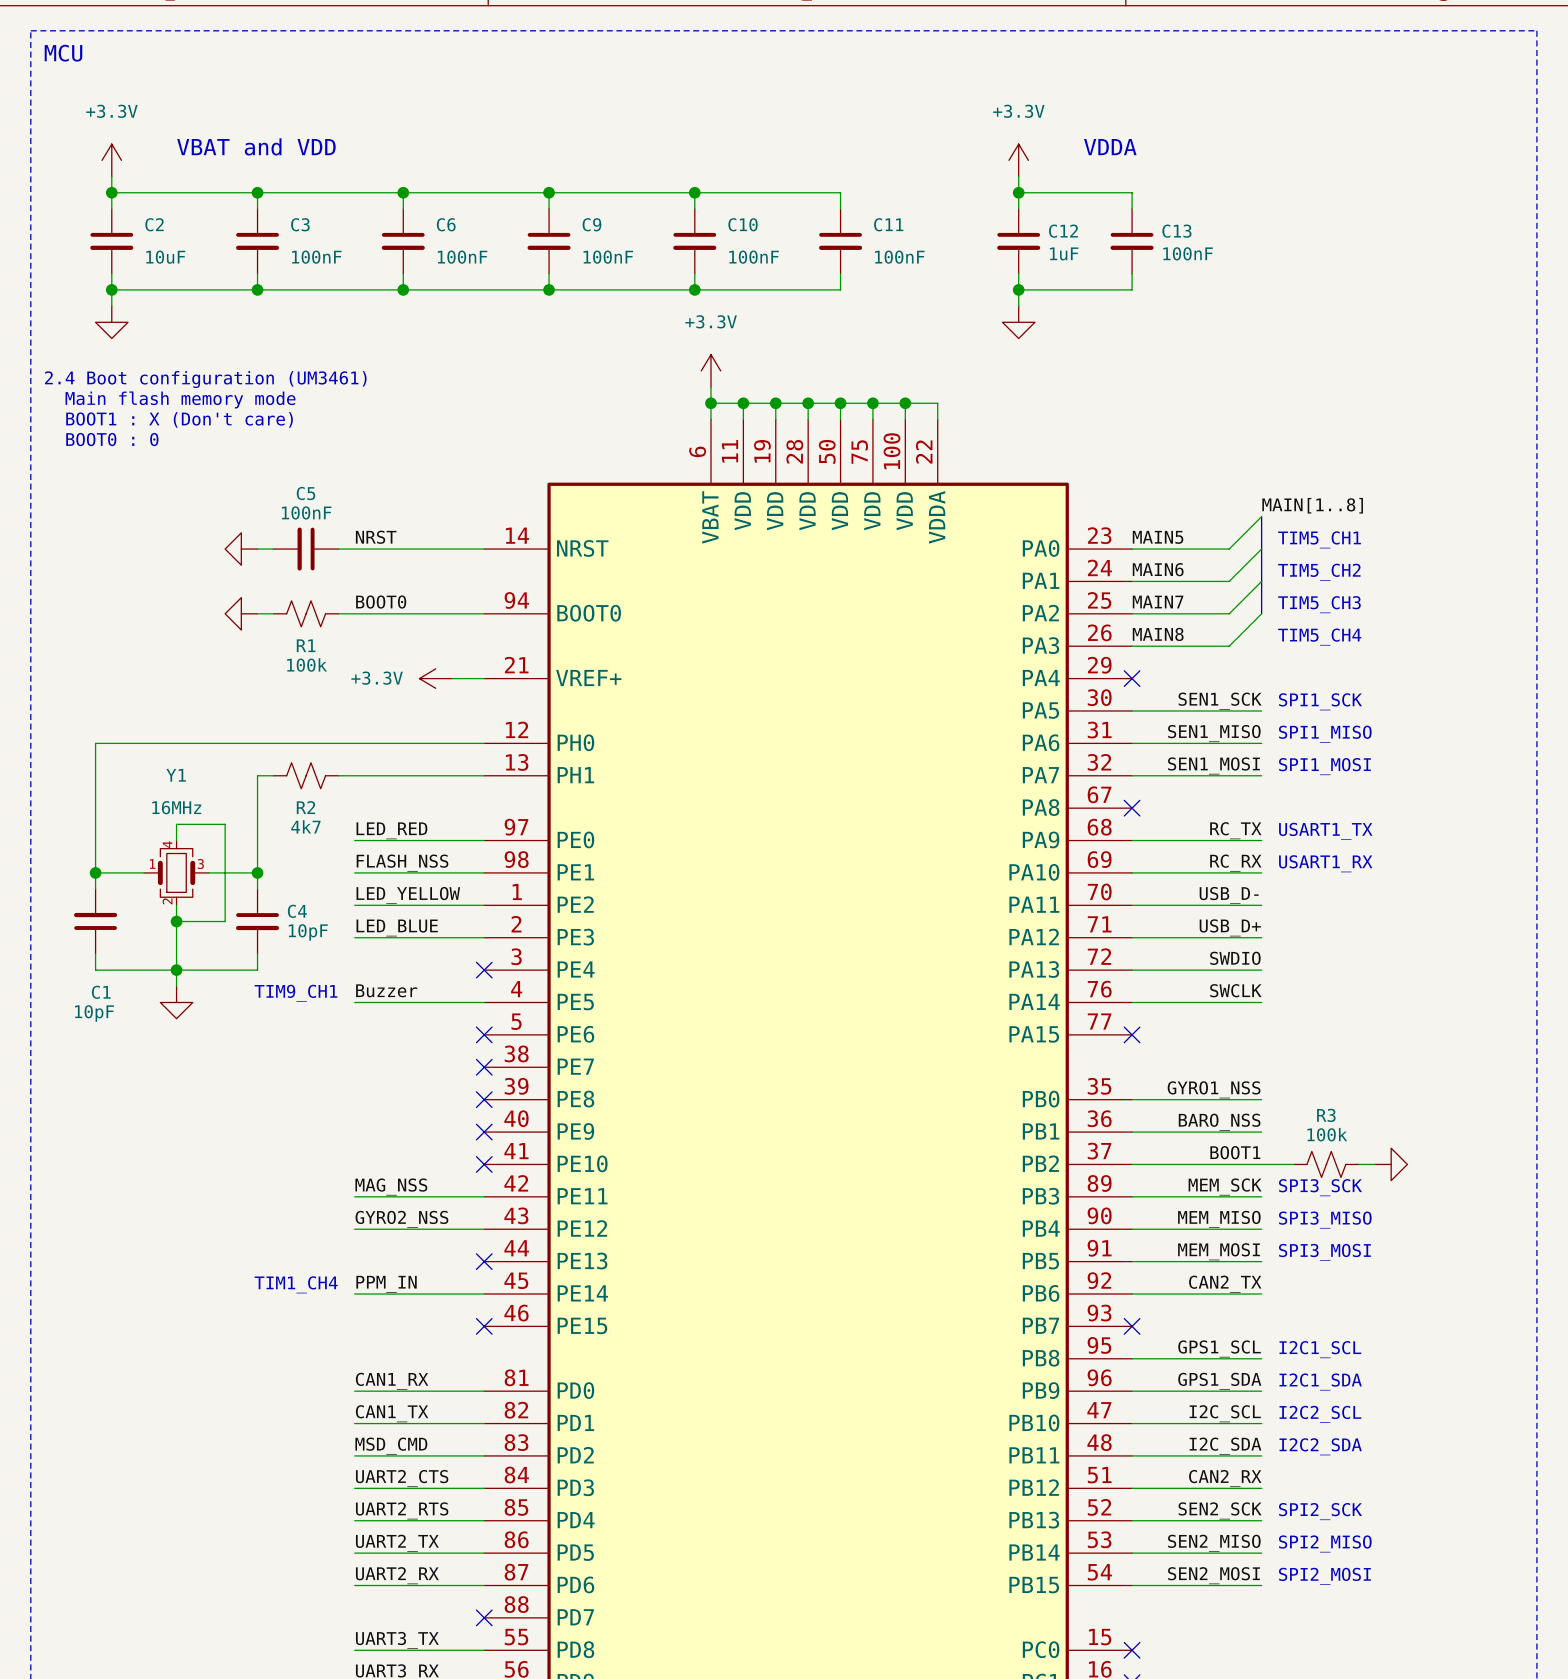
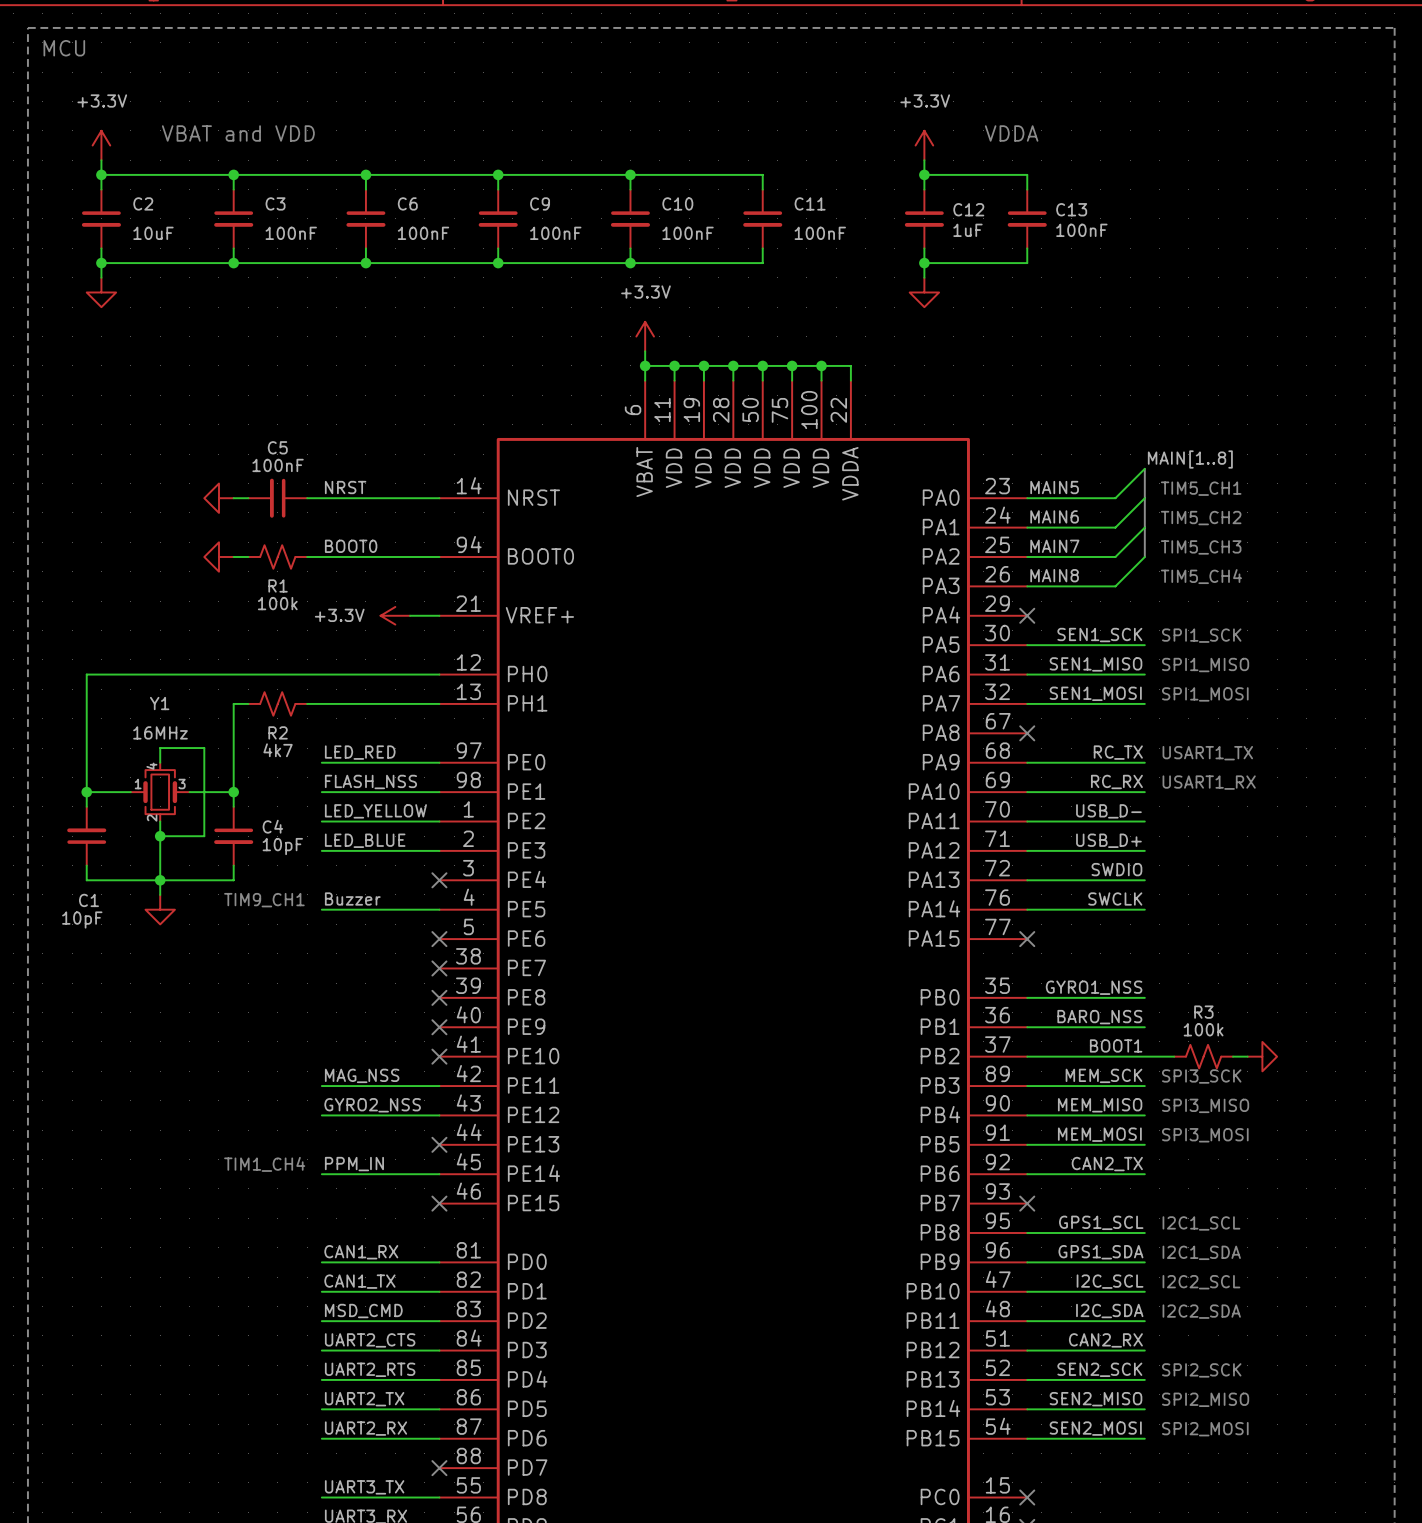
text: 2.4 Boot configuration (UM3461) (205, 379) -> none
text: Main flash memory mode (180, 399) -> none
text: BOOT1 : X (Don't care) (179, 419) -> none
text: BOOT0 : 0 (112, 439) -> none

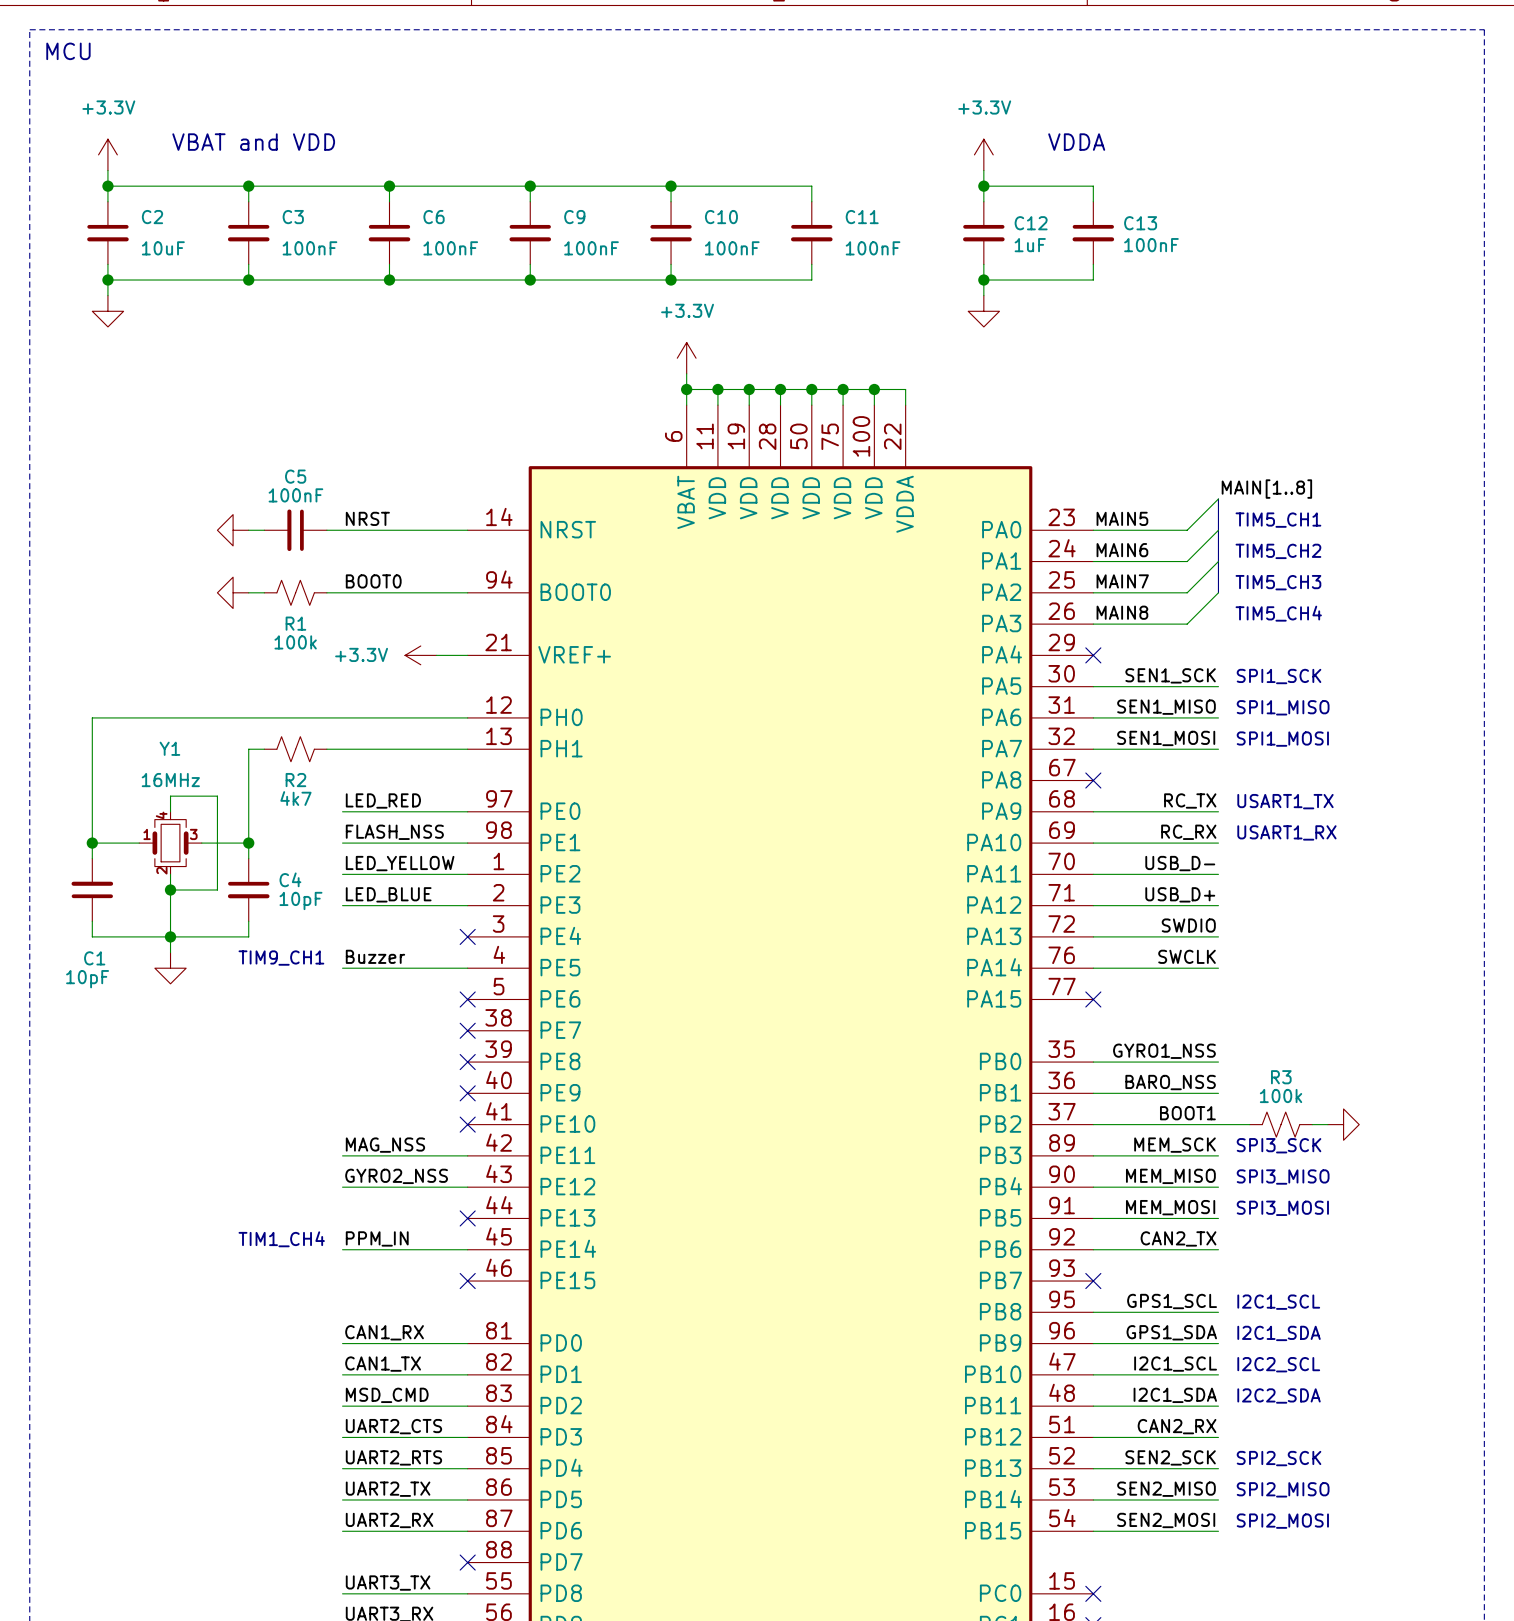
label: I2C_SCL (1110, 1281) -> I2C1_SCL (1175, 1364)
label: I2C_SDA (1109, 1311) -> I2C1_SDA (1175, 1395)

